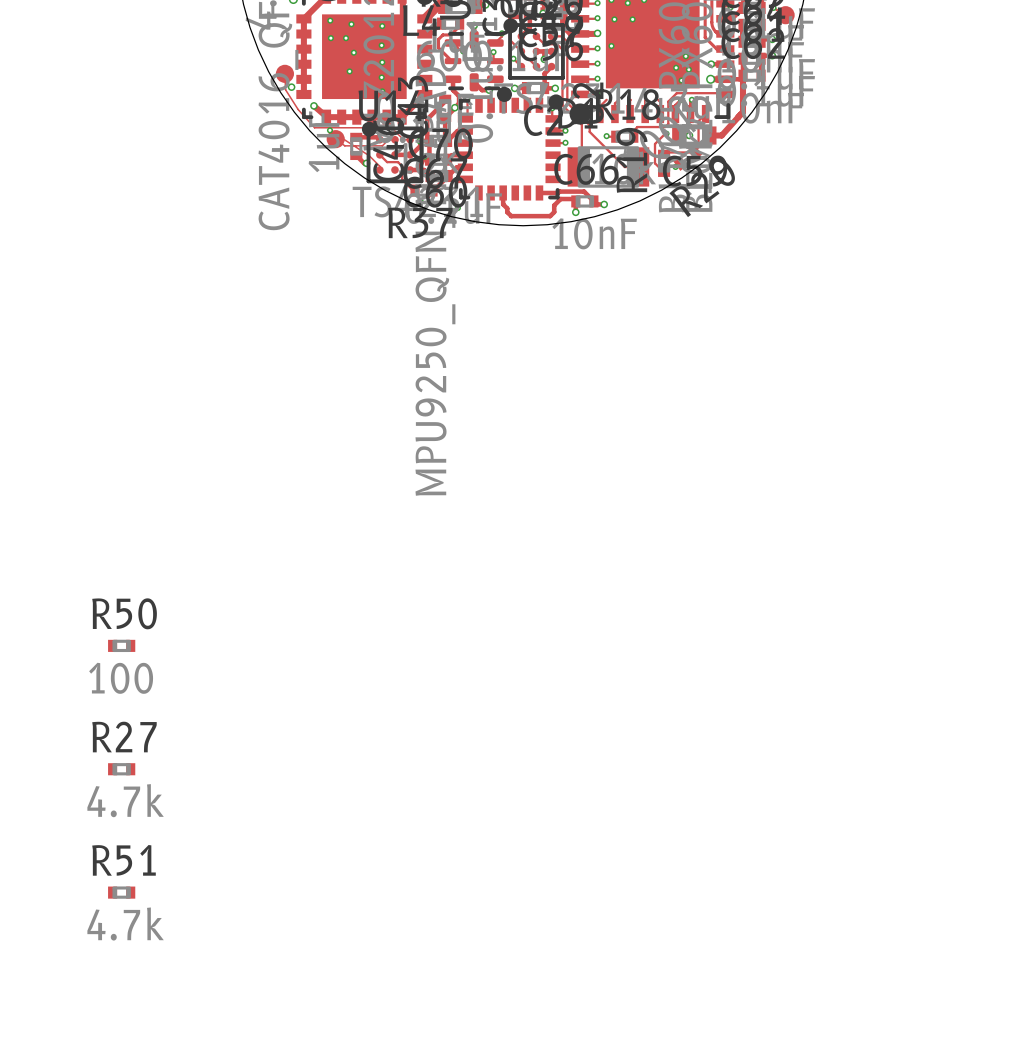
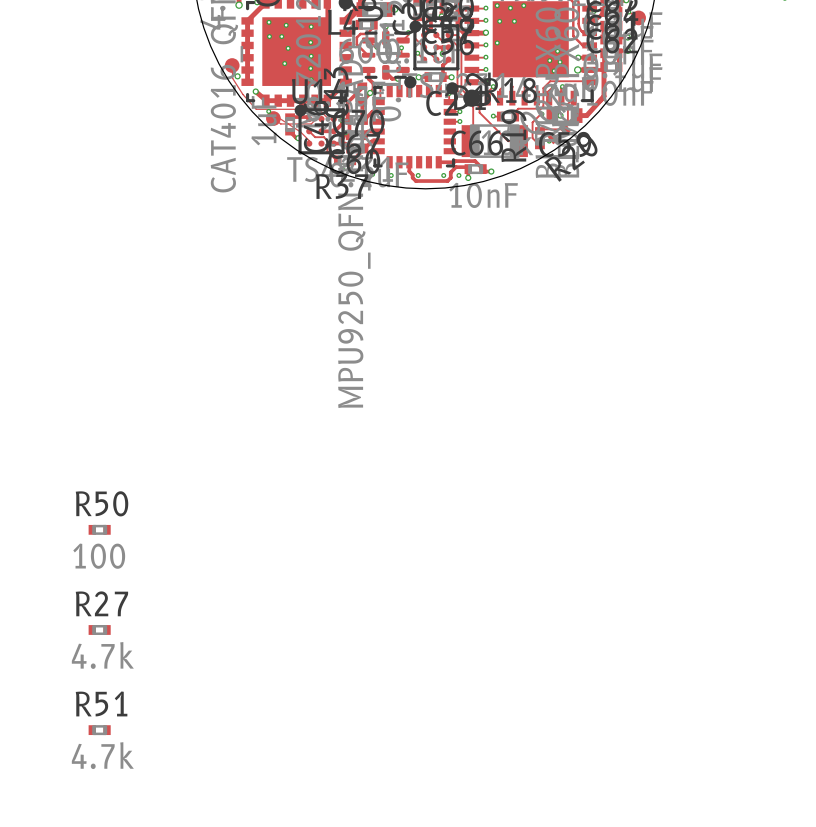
via: none -> (493, 86)
via: none -> (391, 175)
via: none -> (418, 175)
via: none -> (443, 175)
via: none -> (458, 175)

